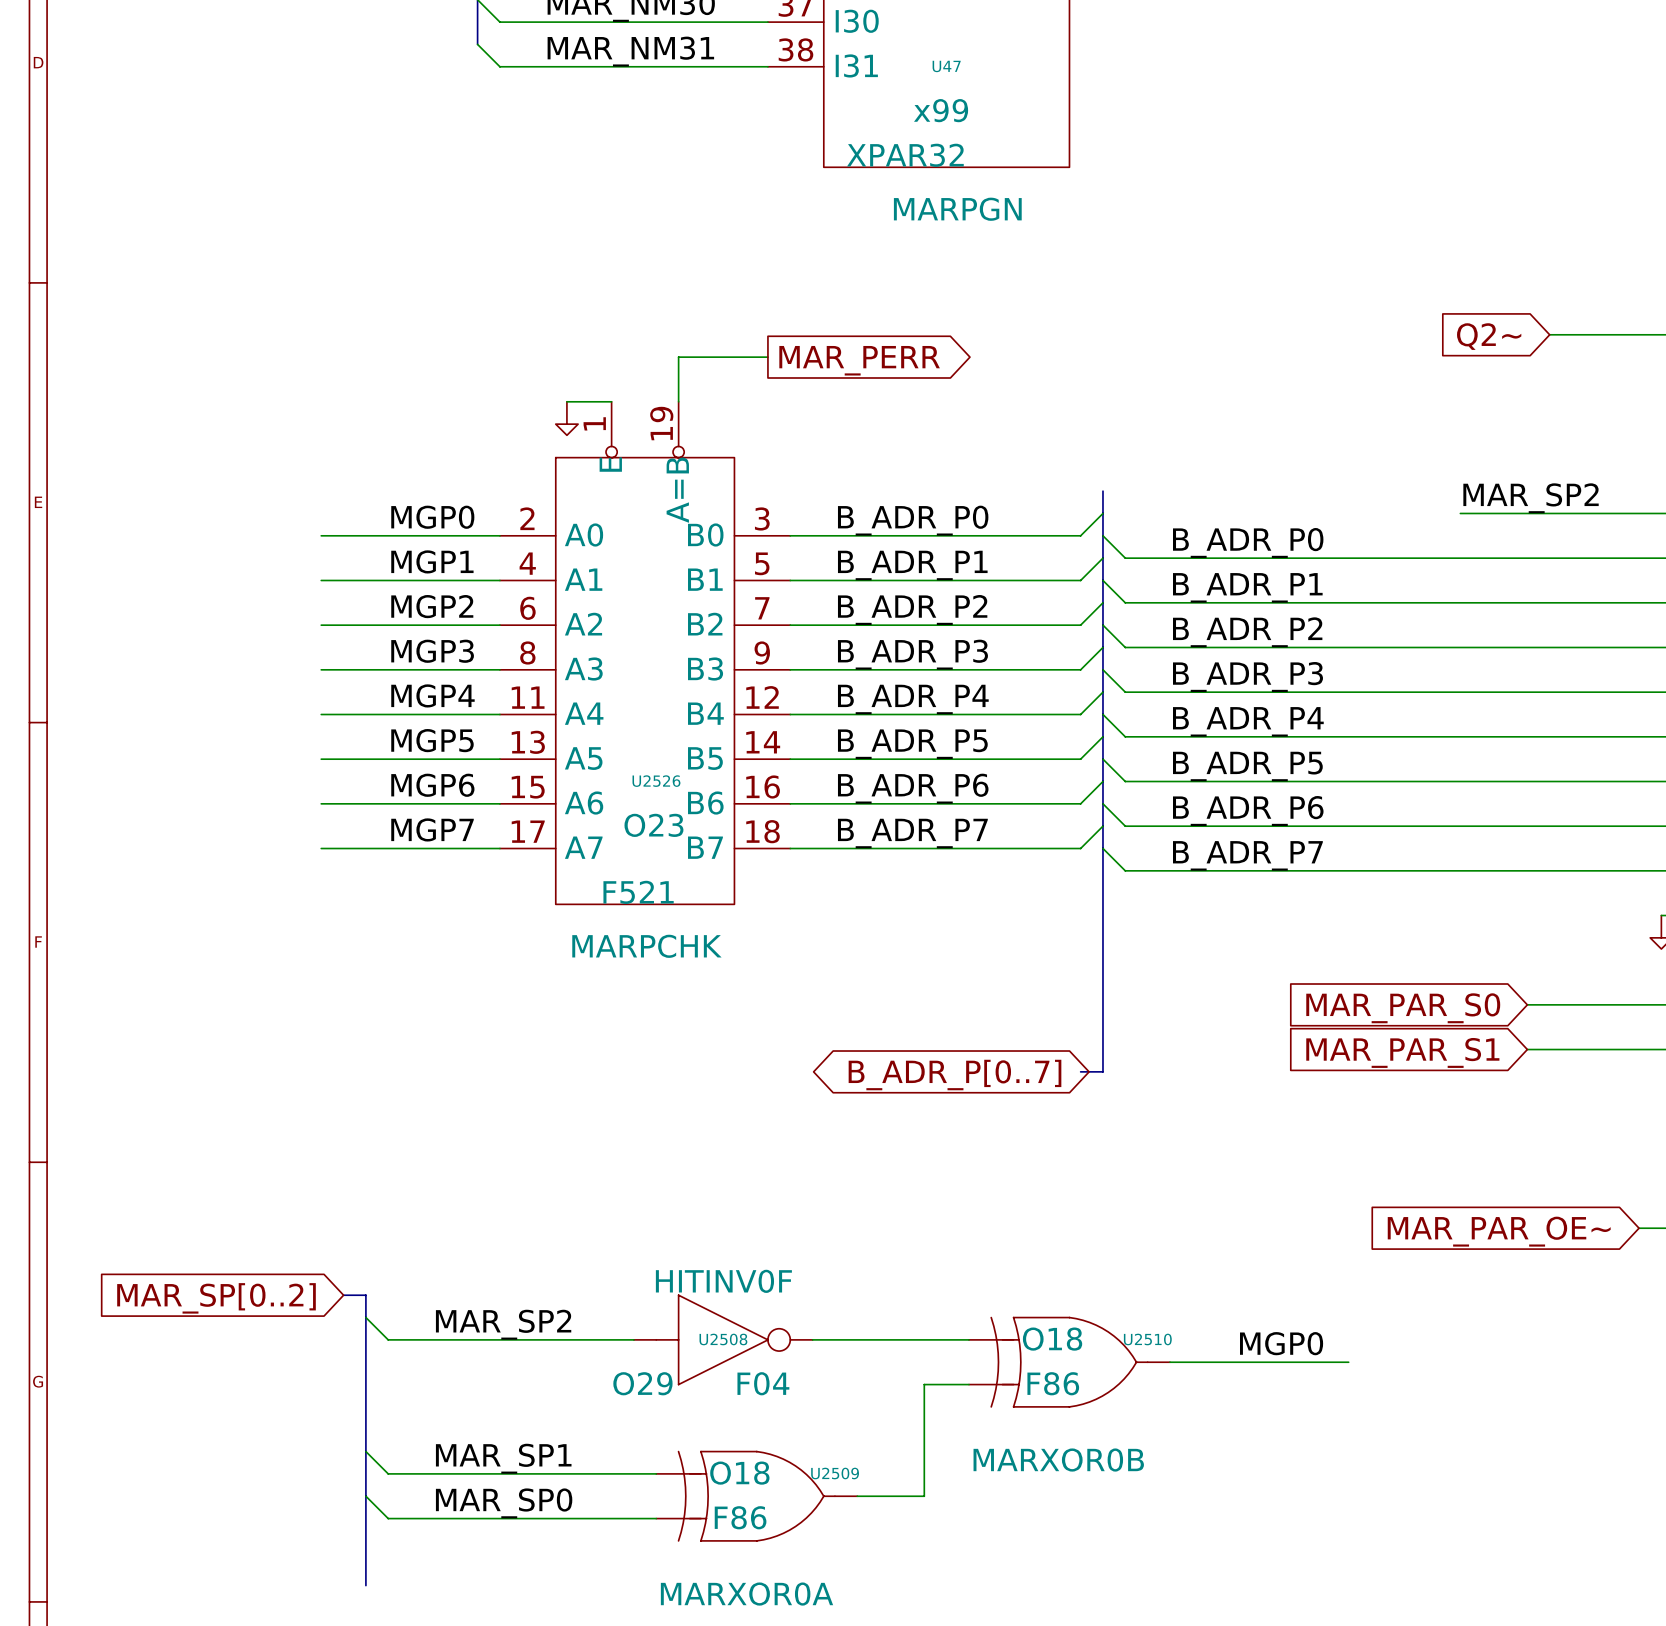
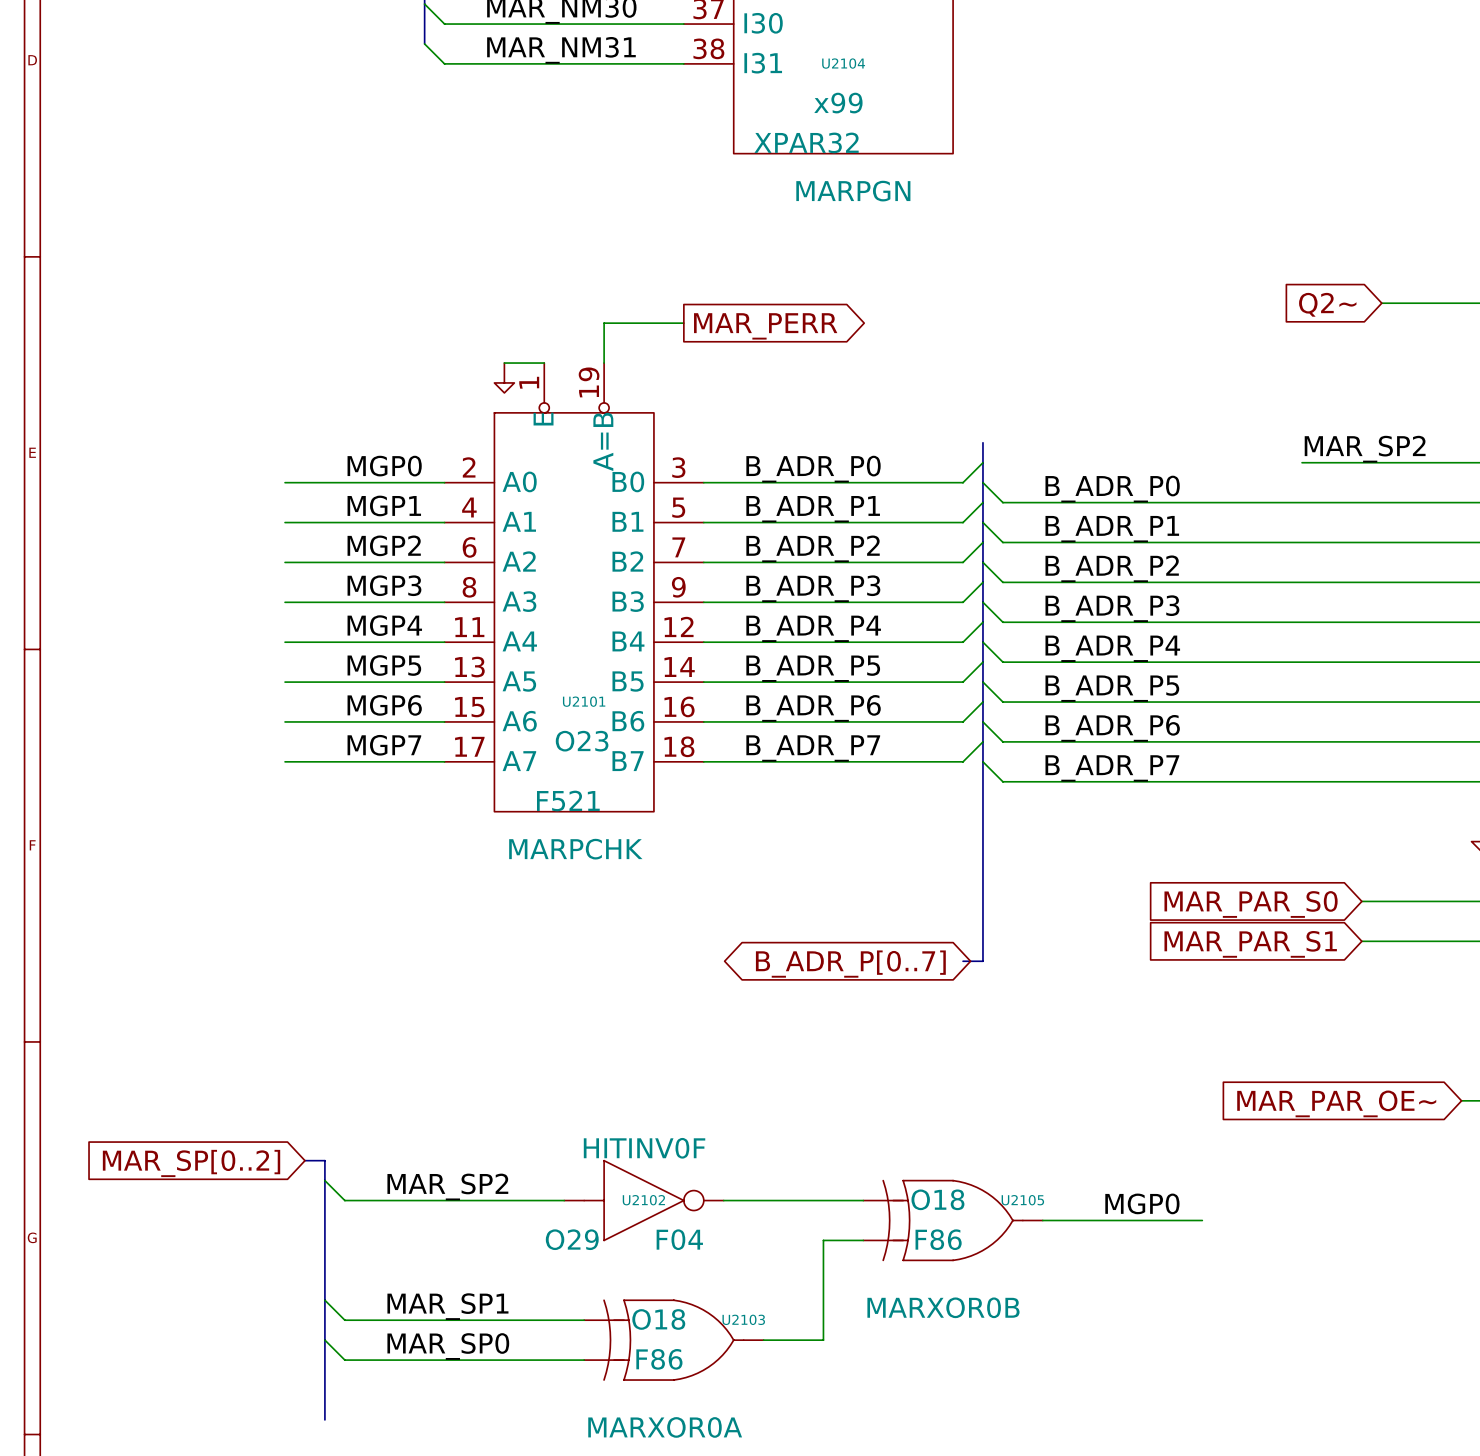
U47 name: U47 (946, 66) -> U2104 (843, 63)
U2526 name: U2526 (656, 781) -> U2101 (584, 701)
U2508 name: U2508 (723, 1339) -> U2102 (643, 1200)
U2510 name: U2510 (1147, 1339) -> U2105 (1022, 1200)
U2509 name: U2509 (835, 1473) -> U2103 (743, 1319)

